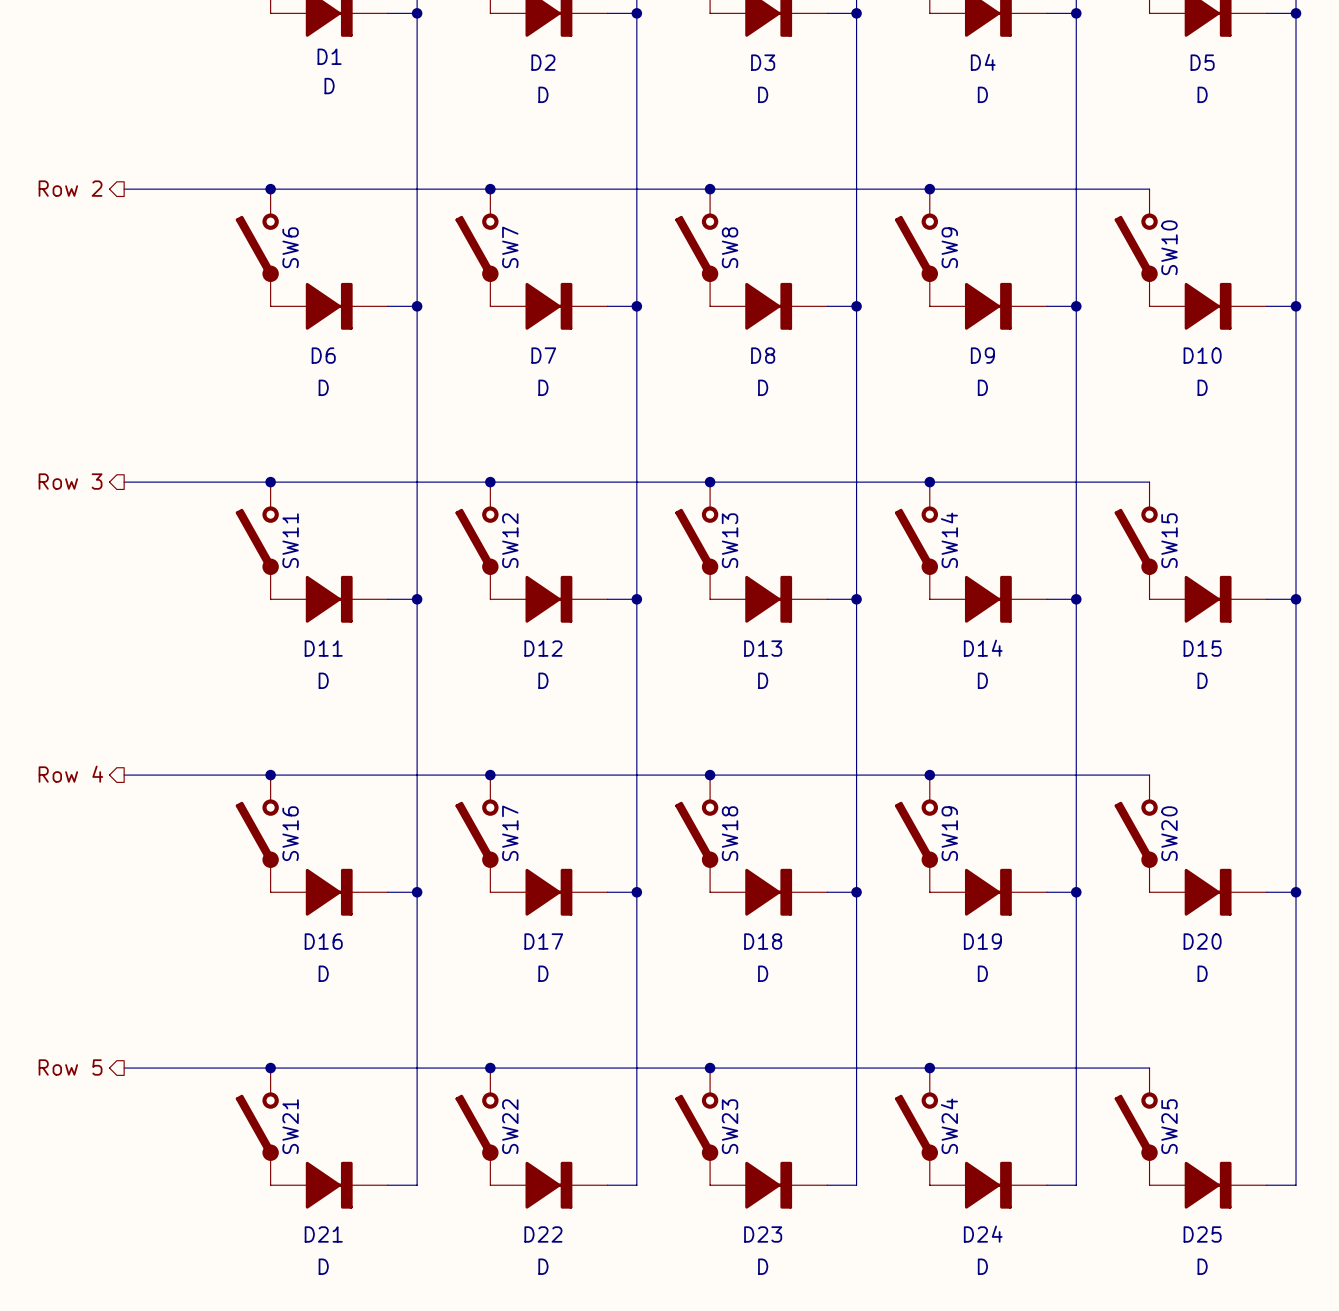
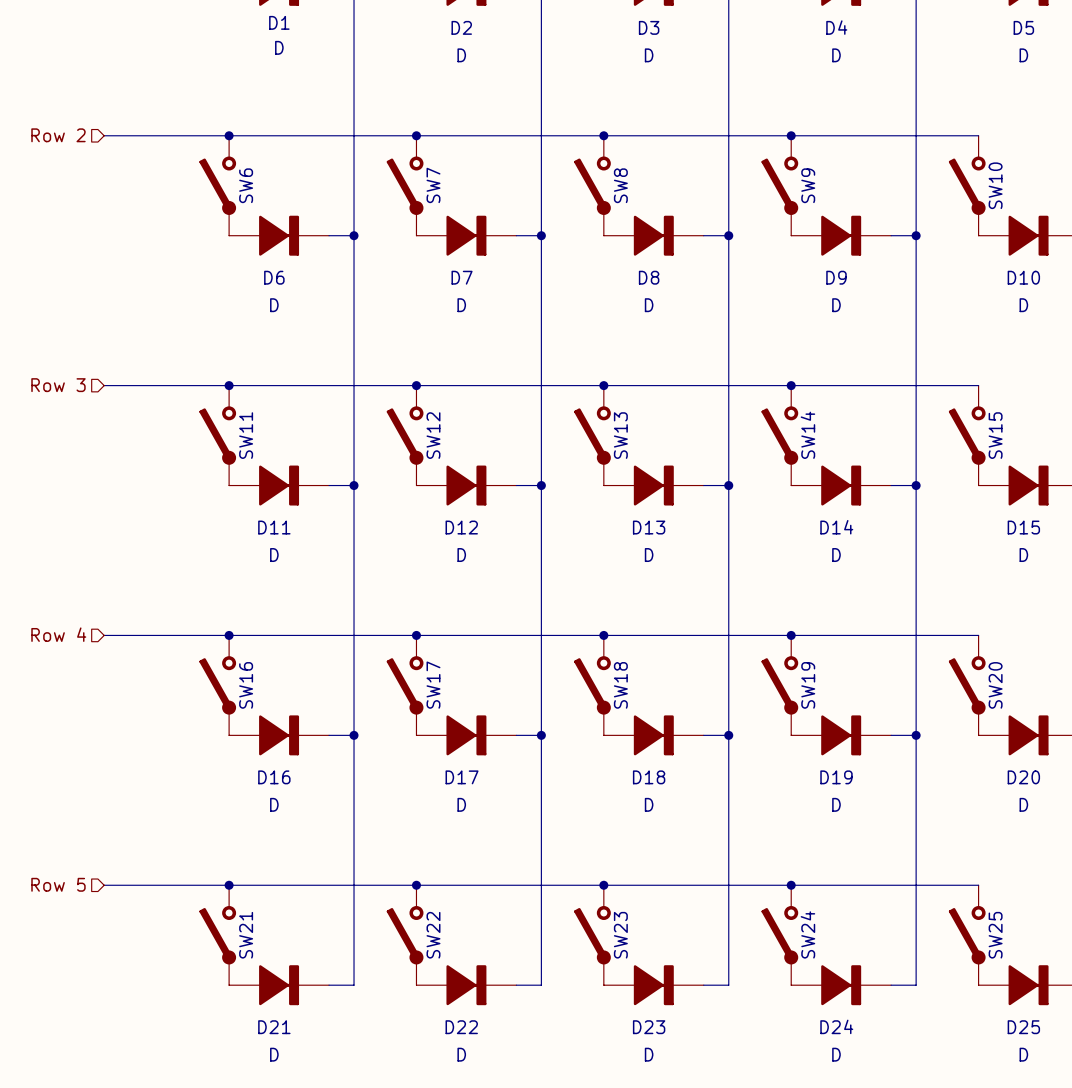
hierarchical label shape: output (70, 188) -> input (58, 135)
hierarchical label shape: output (70, 481) -> input (58, 385)
hierarchical label shape: output (70, 774) -> input (58, 634)
hierarchical label shape: output (70, 1067) -> input (58, 884)

